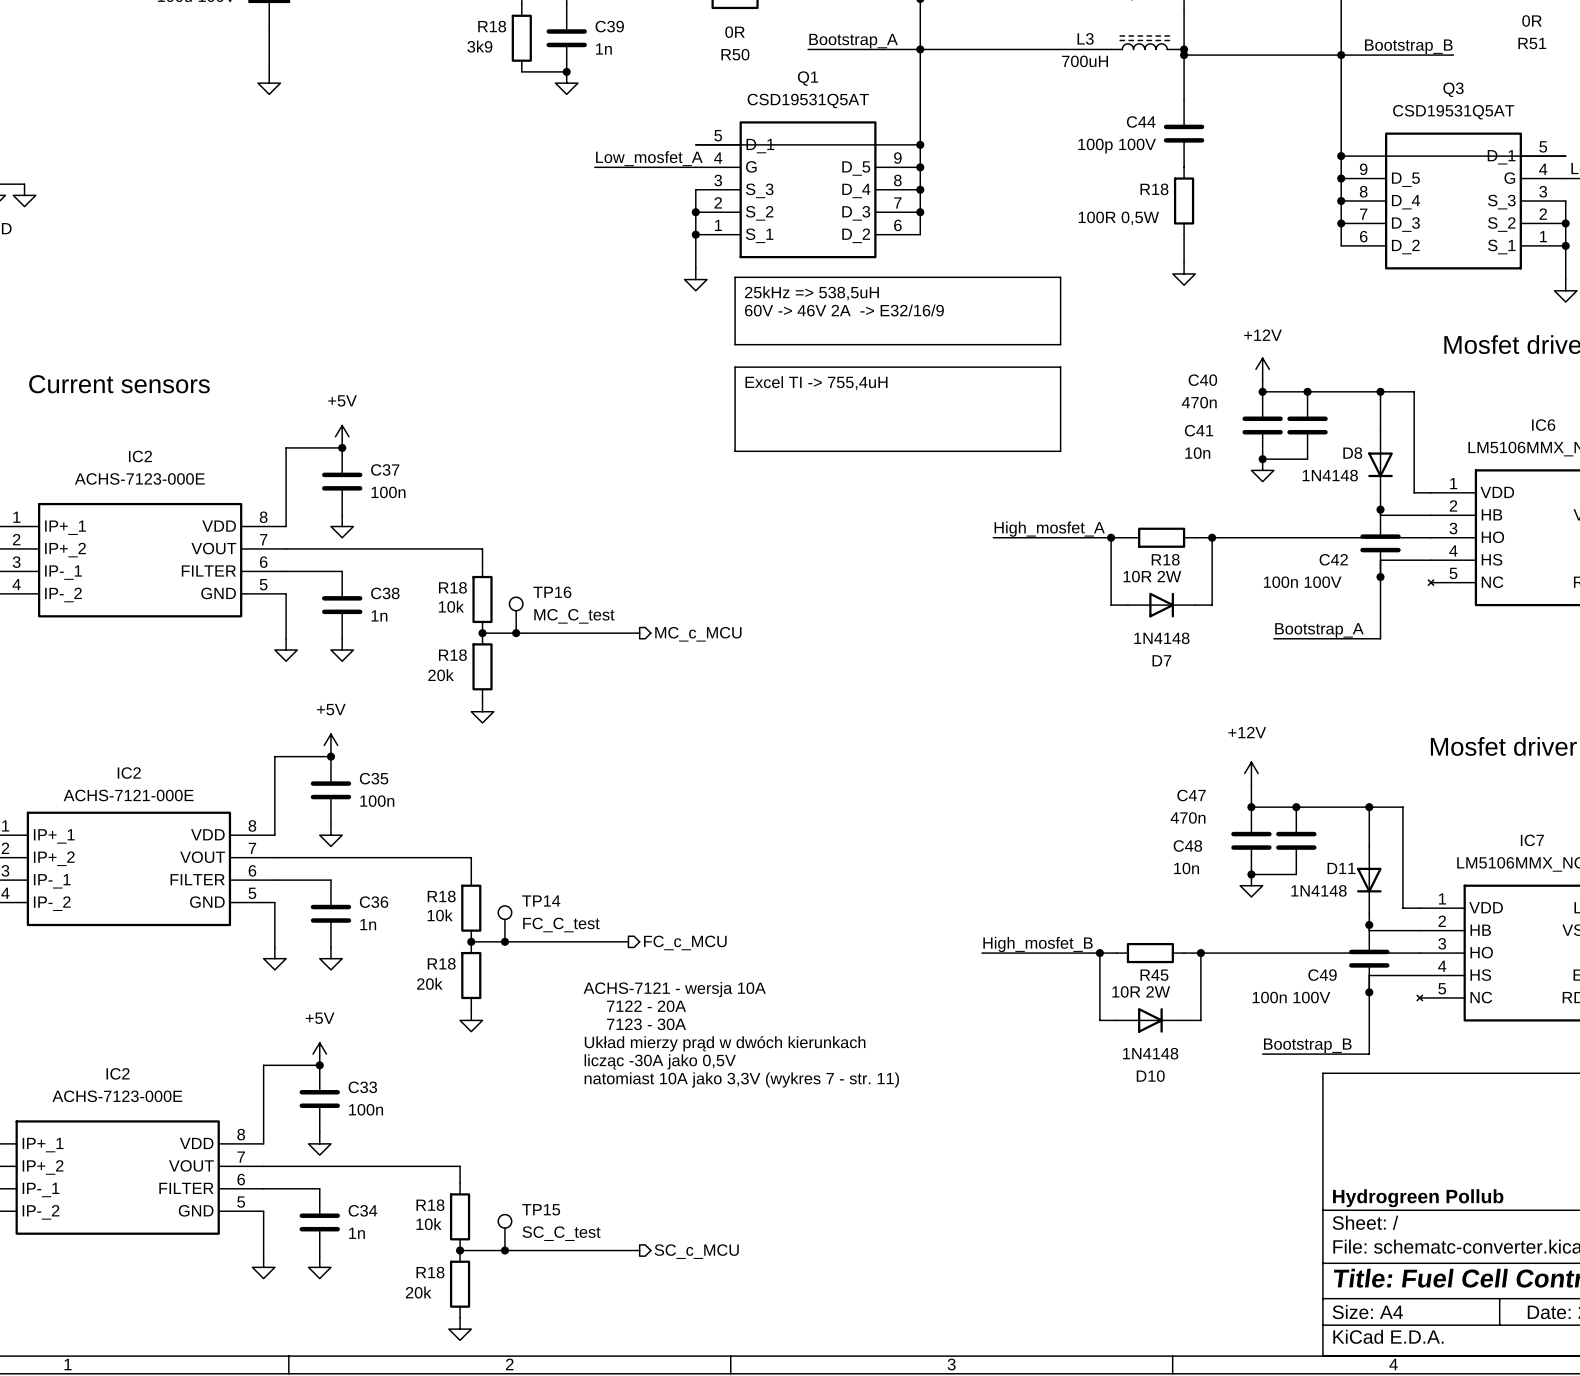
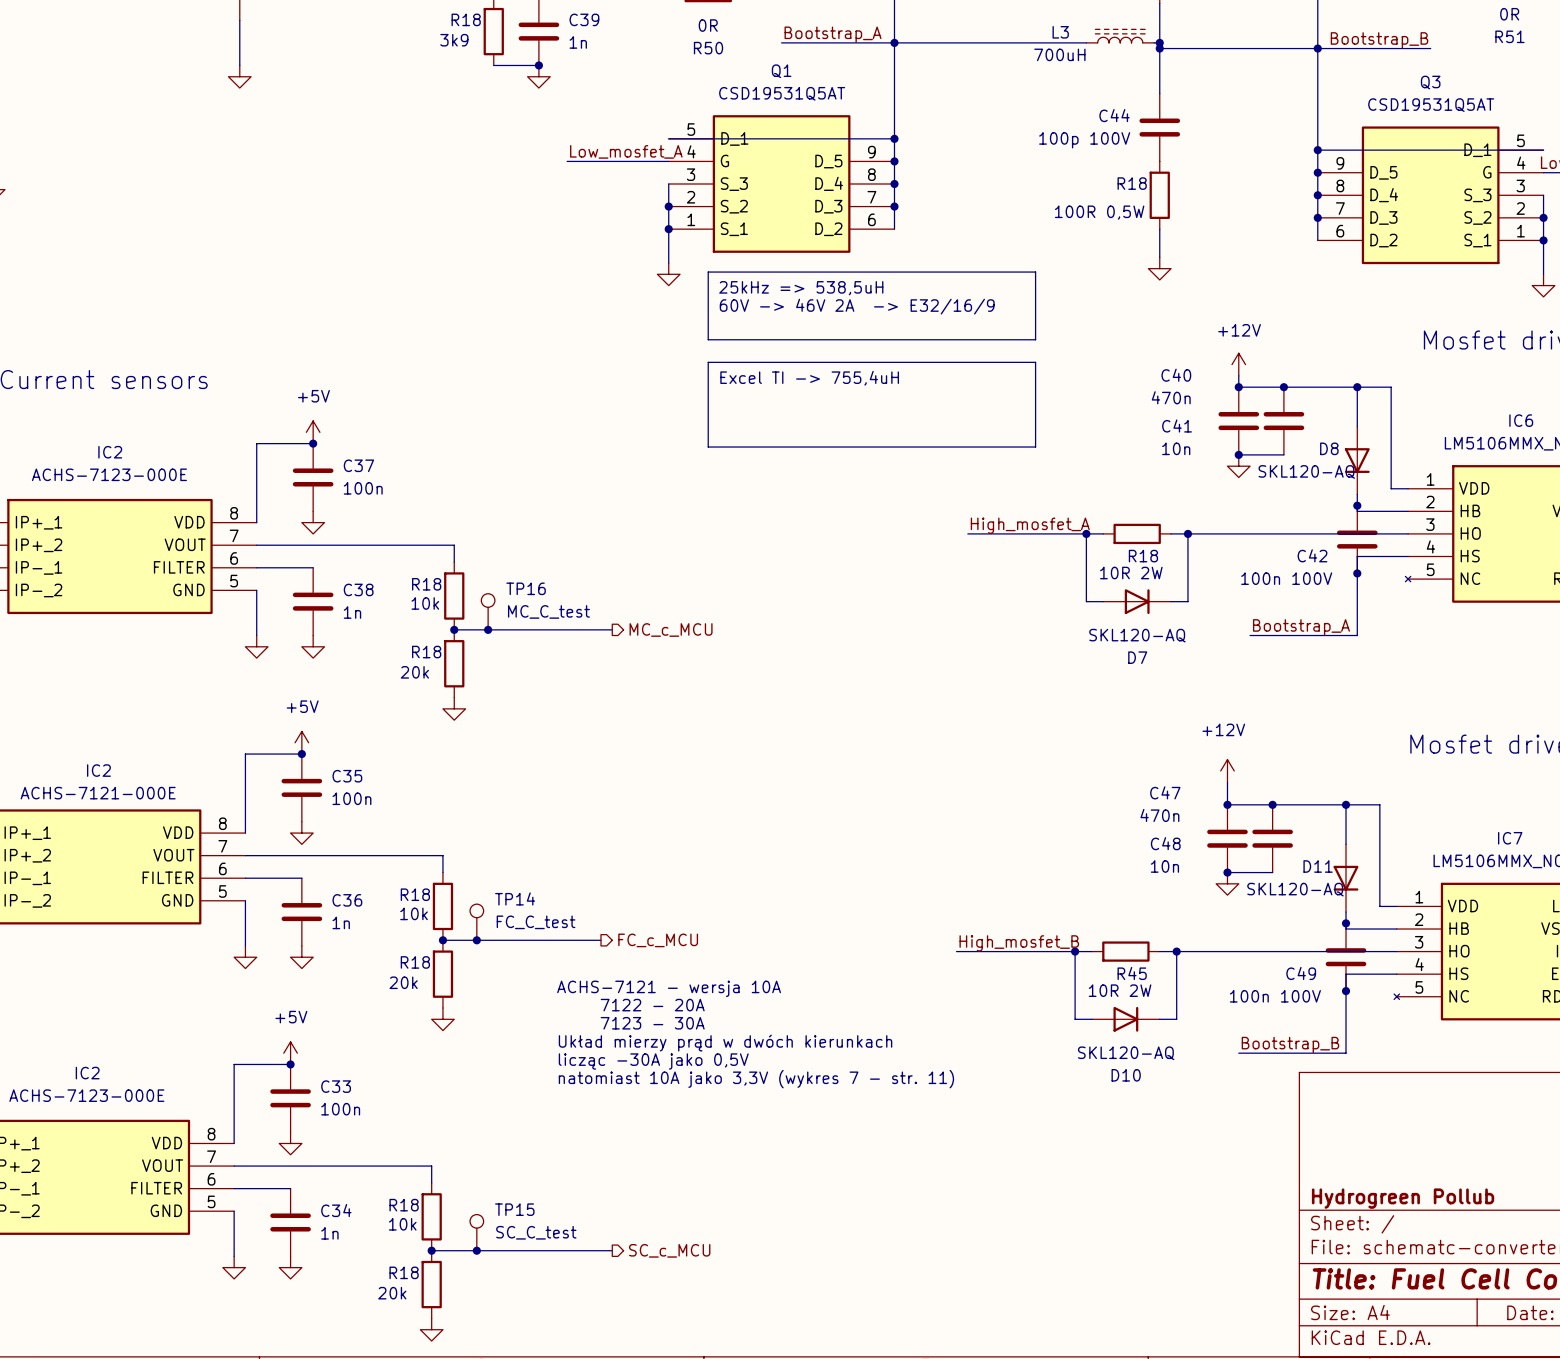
D8 value: 1N4148 (1330, 475) -> SKL120-AQ (1306, 471)
D7 value: 1N4148 (1161, 638) -> SKL120-AQ (1137, 635)
D11 value: 1N4148 (1319, 890) -> SKL120-AQ (1295, 889)
D10 value: 1N4148 (1150, 1053) -> SKL120-AQ (1126, 1053)

